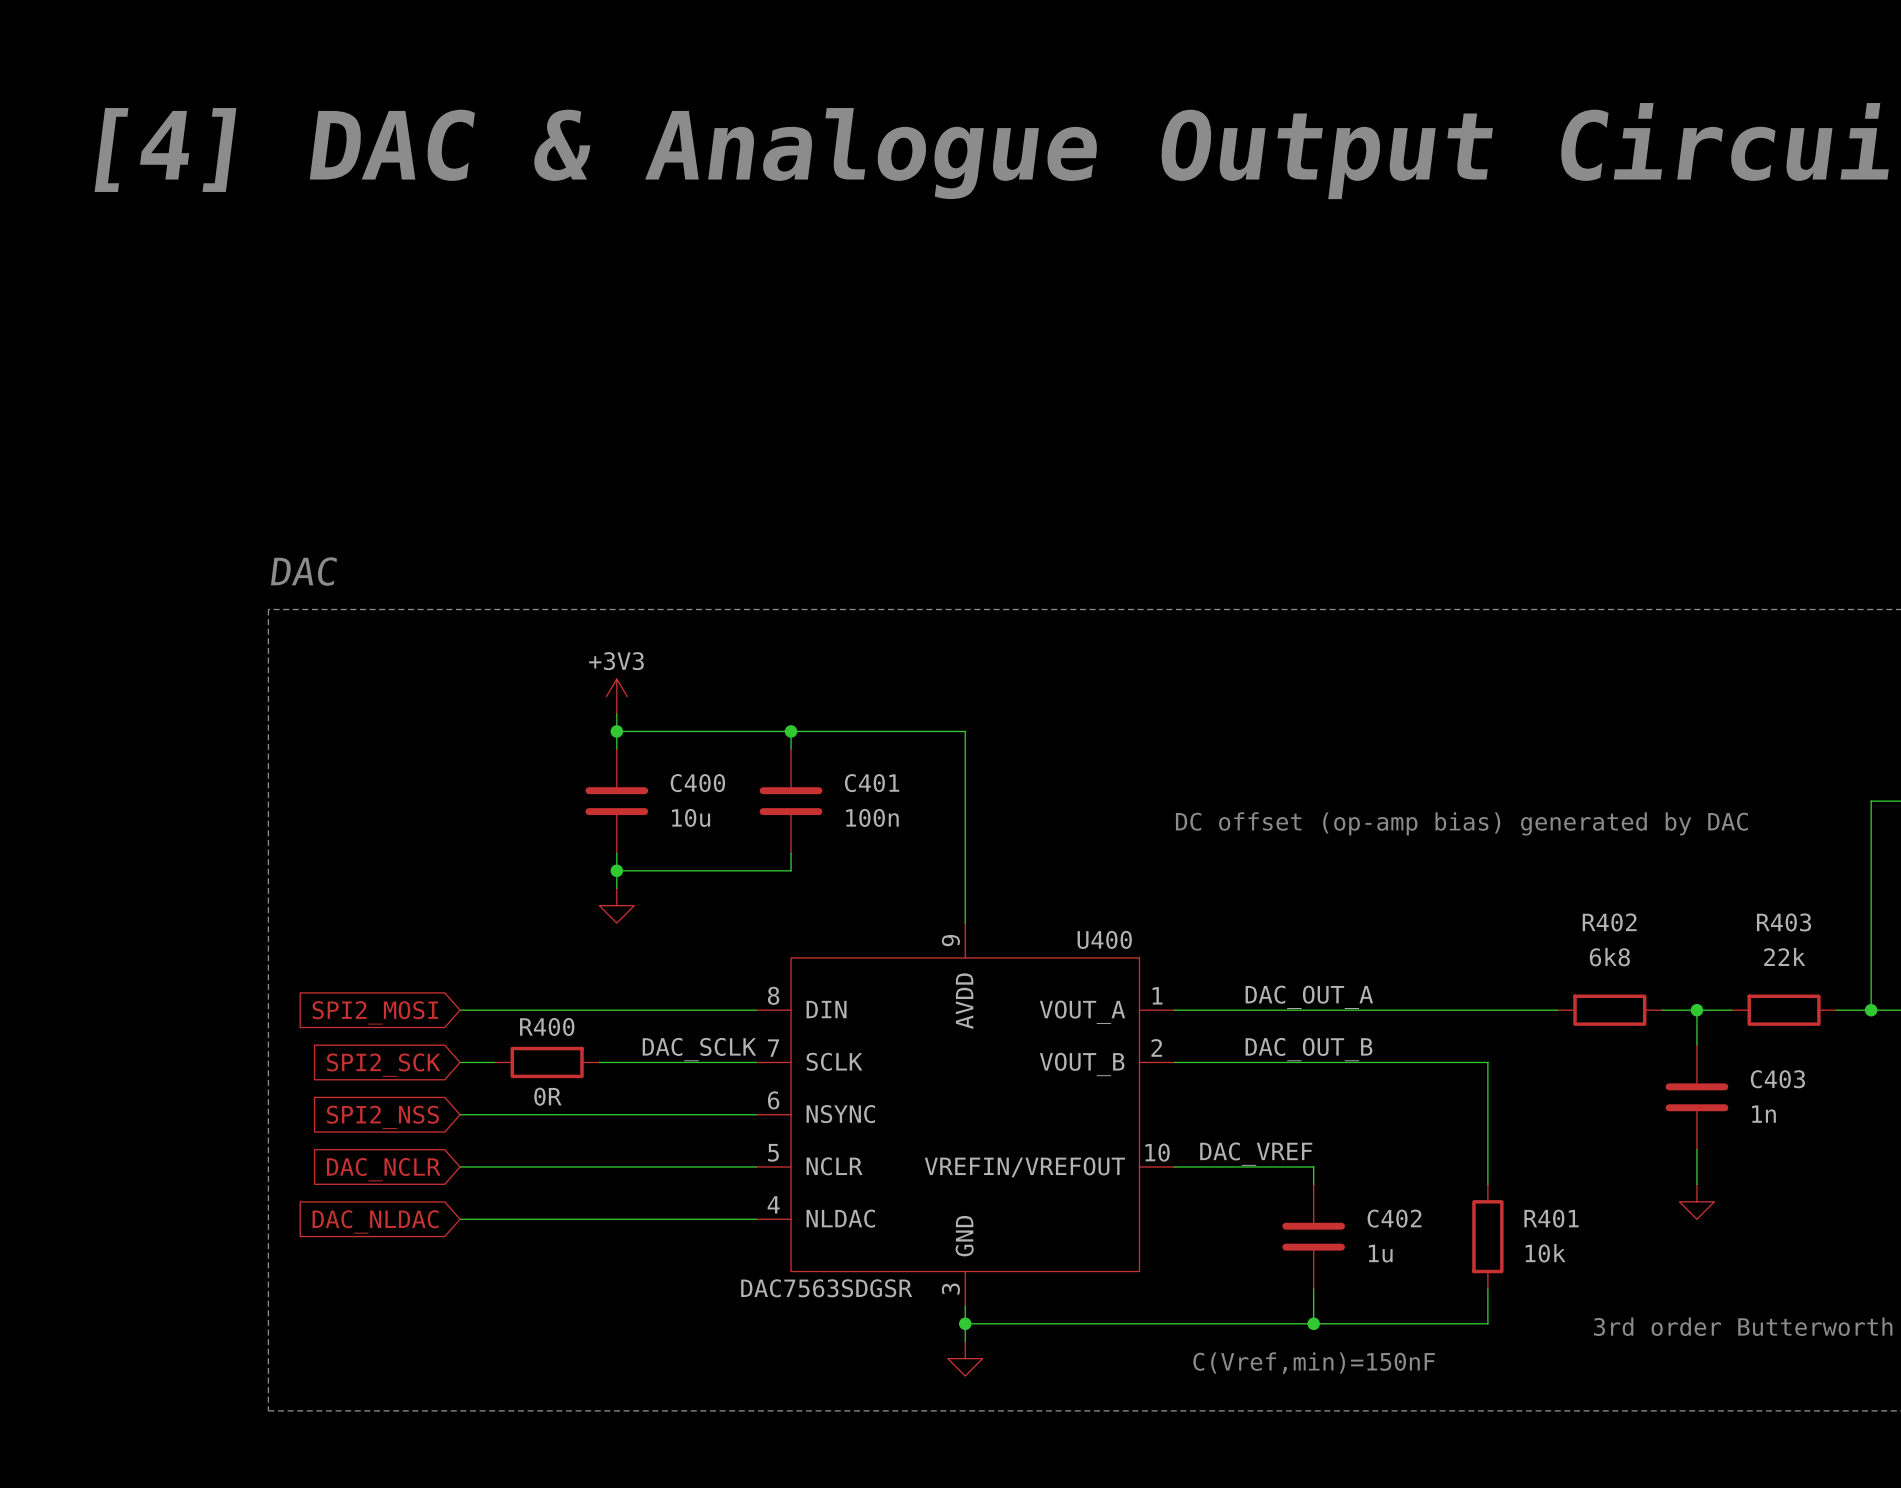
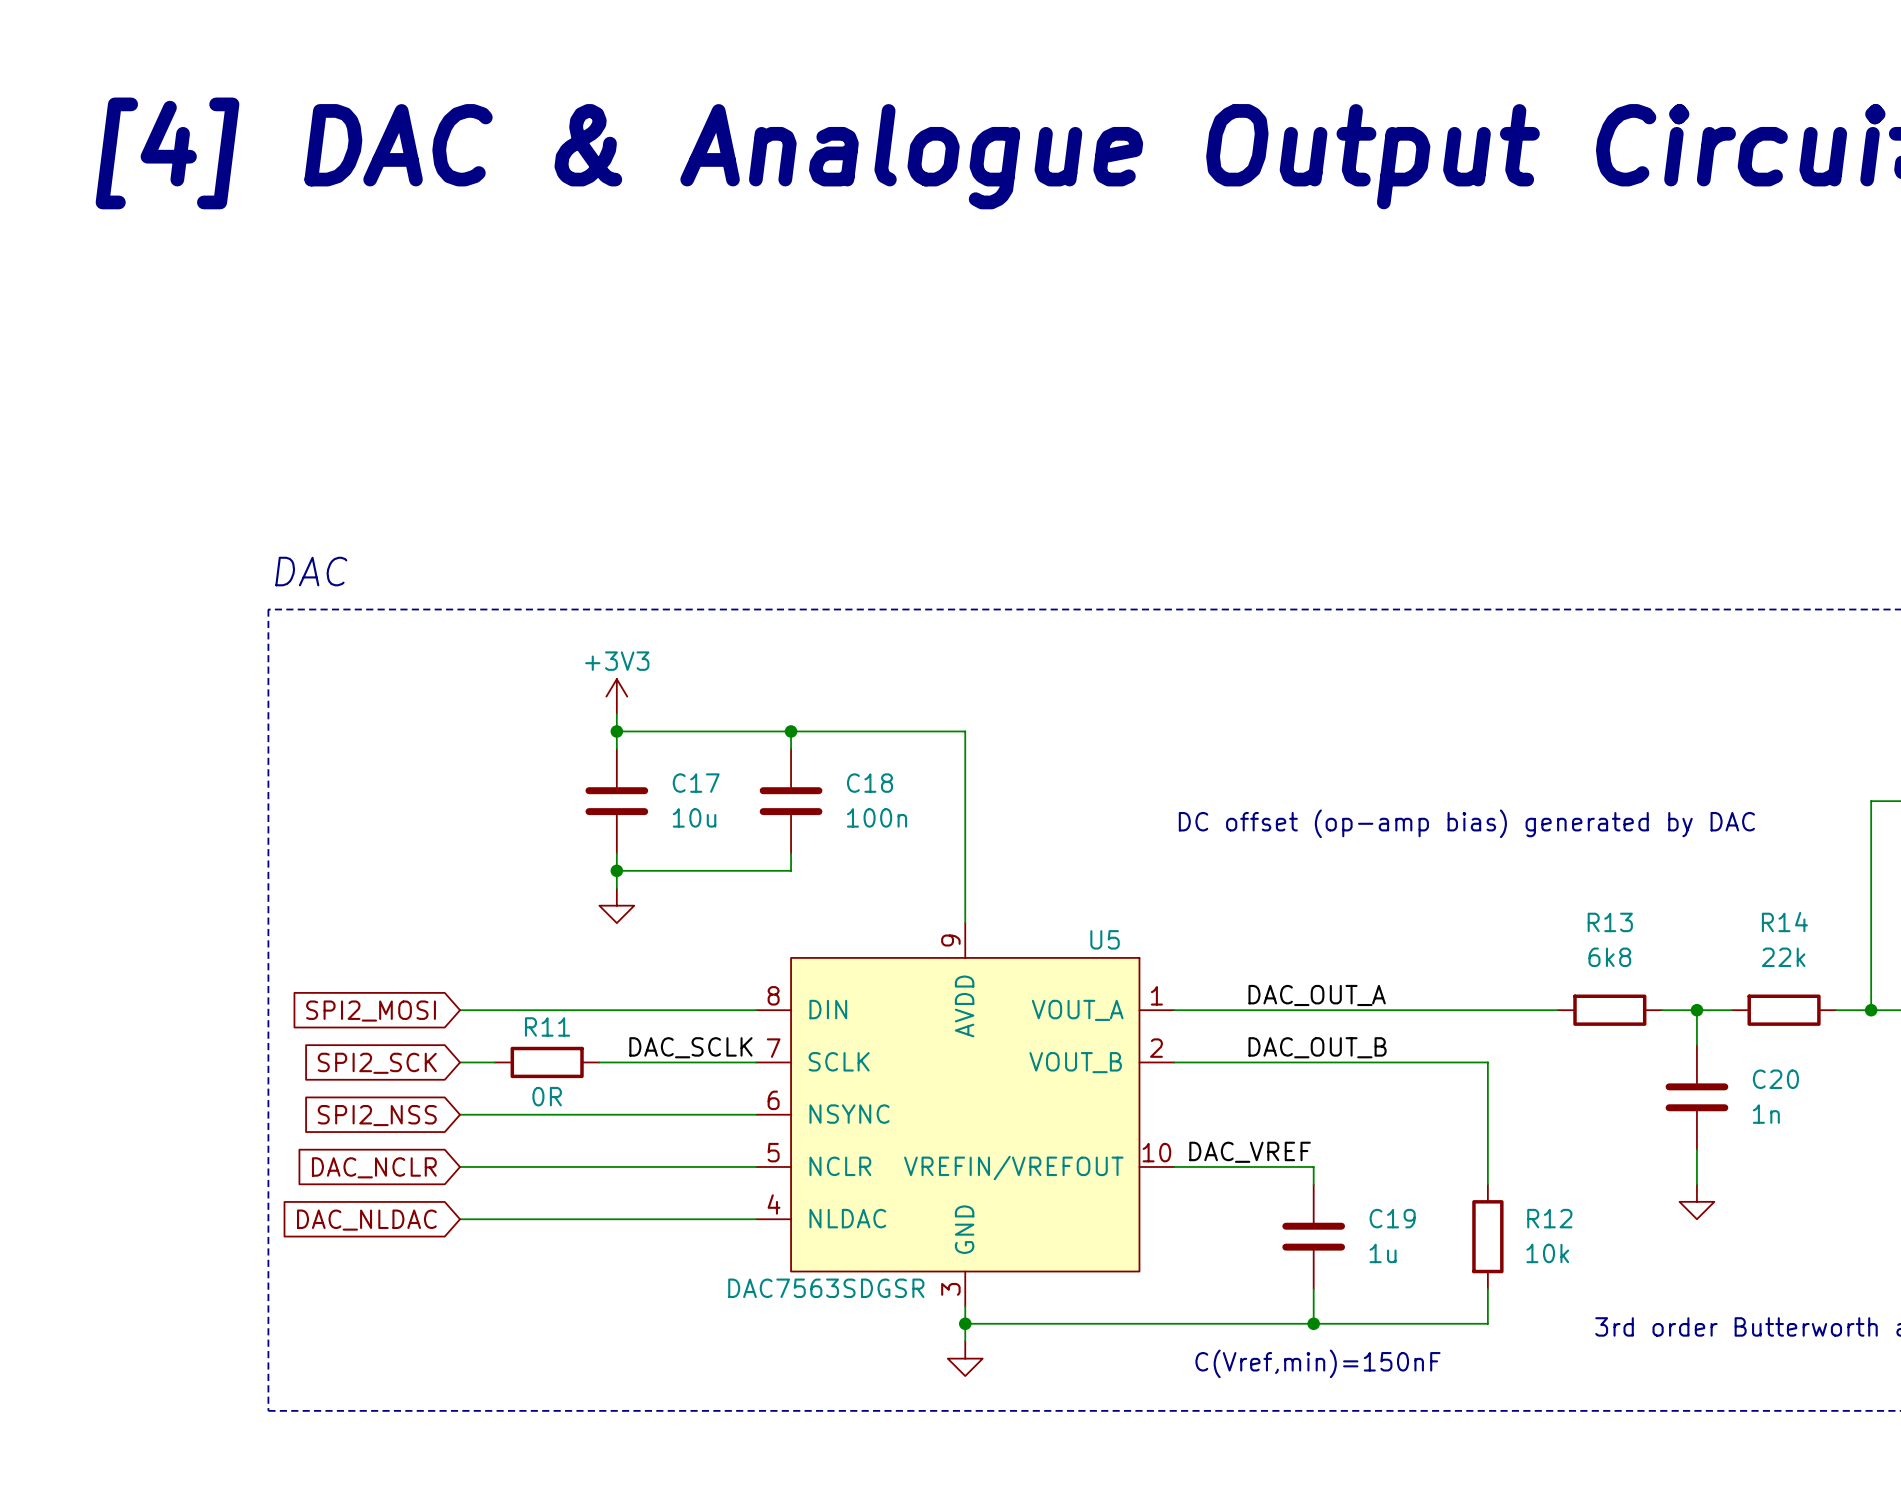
C400 name: C400 (697, 783) -> C17 (696, 783)
C401 name: C401 (872, 783) -> C18 (869, 783)
R402 name: R402 (1609, 922) -> R13 (1610, 922)
R403 name: R403 (1784, 922) -> R14 (1784, 922)
U400 name: U400 (1104, 939) -> U5 (1105, 939)
R400 name: R400 (547, 1026) -> R11 (547, 1026)
C403 name: C403 (1777, 1079) -> C20 (1775, 1079)
C402 name: C402 (1394, 1218) -> C19 (1392, 1218)
R401 name: R401 (1551, 1218) -> R12 (1549, 1218)

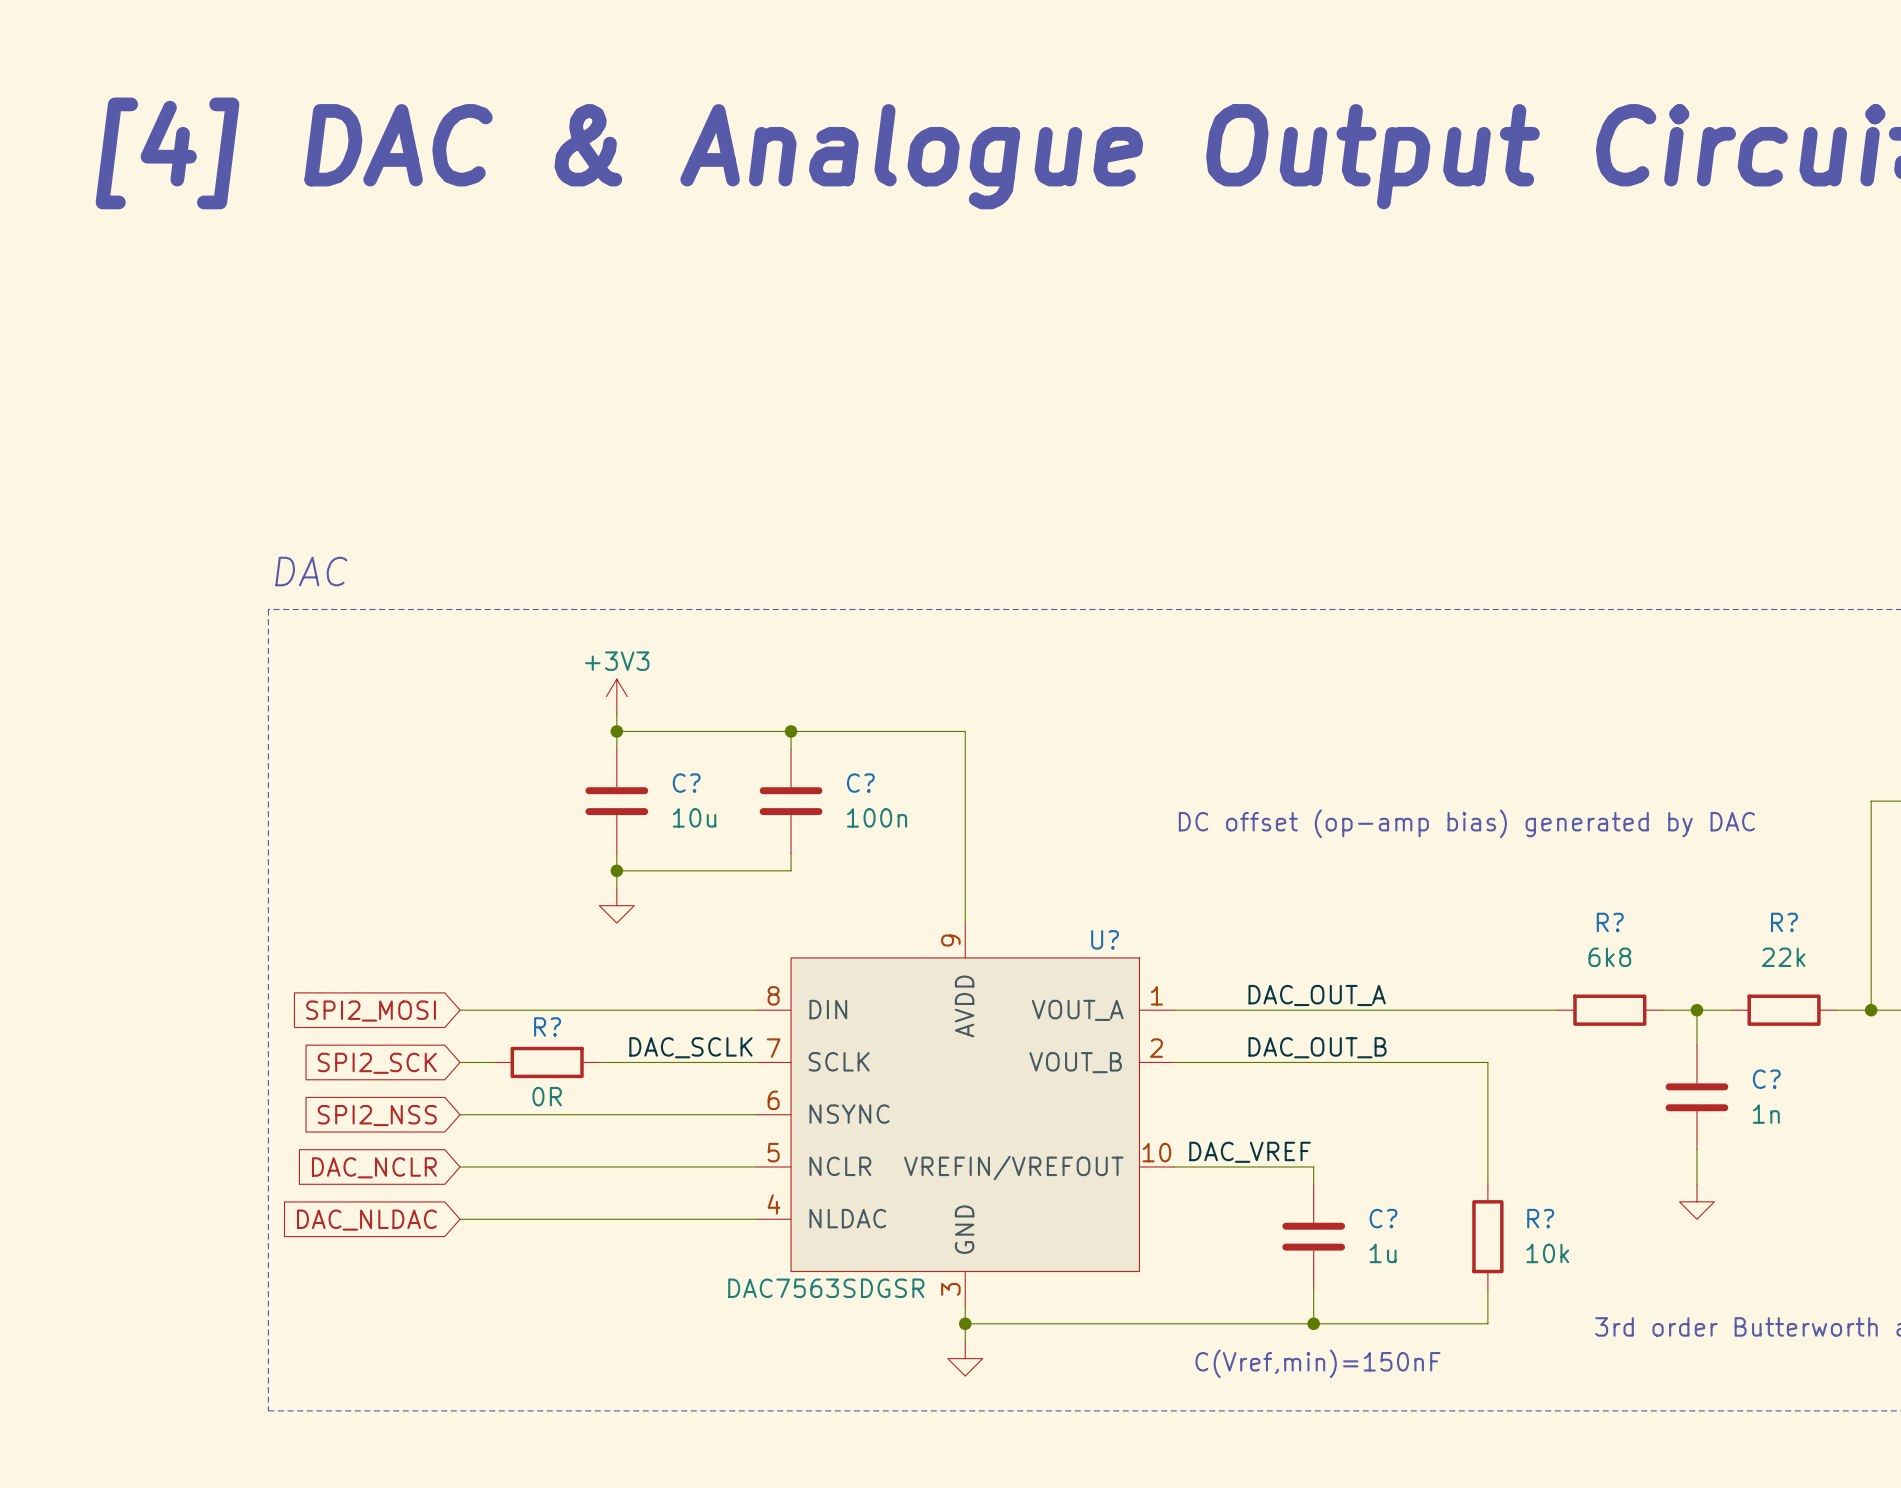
C17 name: C17 (696, 783) -> C? (686, 783)
C18 name: C18 (869, 783) -> C? (860, 783)
R13 name: R13 (1610, 922) -> R? (1610, 922)
R14 name: R14 (1784, 922) -> R? (1784, 922)
U5 name: U5 (1105, 939) -> U? (1105, 939)
R11 name: R11 (547, 1026) -> R? (547, 1026)
C20 name: C20 (1775, 1079) -> C? (1766, 1079)
C19 name: C19 (1392, 1218) -> C? (1383, 1218)
R12 name: R12 (1549, 1218) -> R? (1540, 1218)

